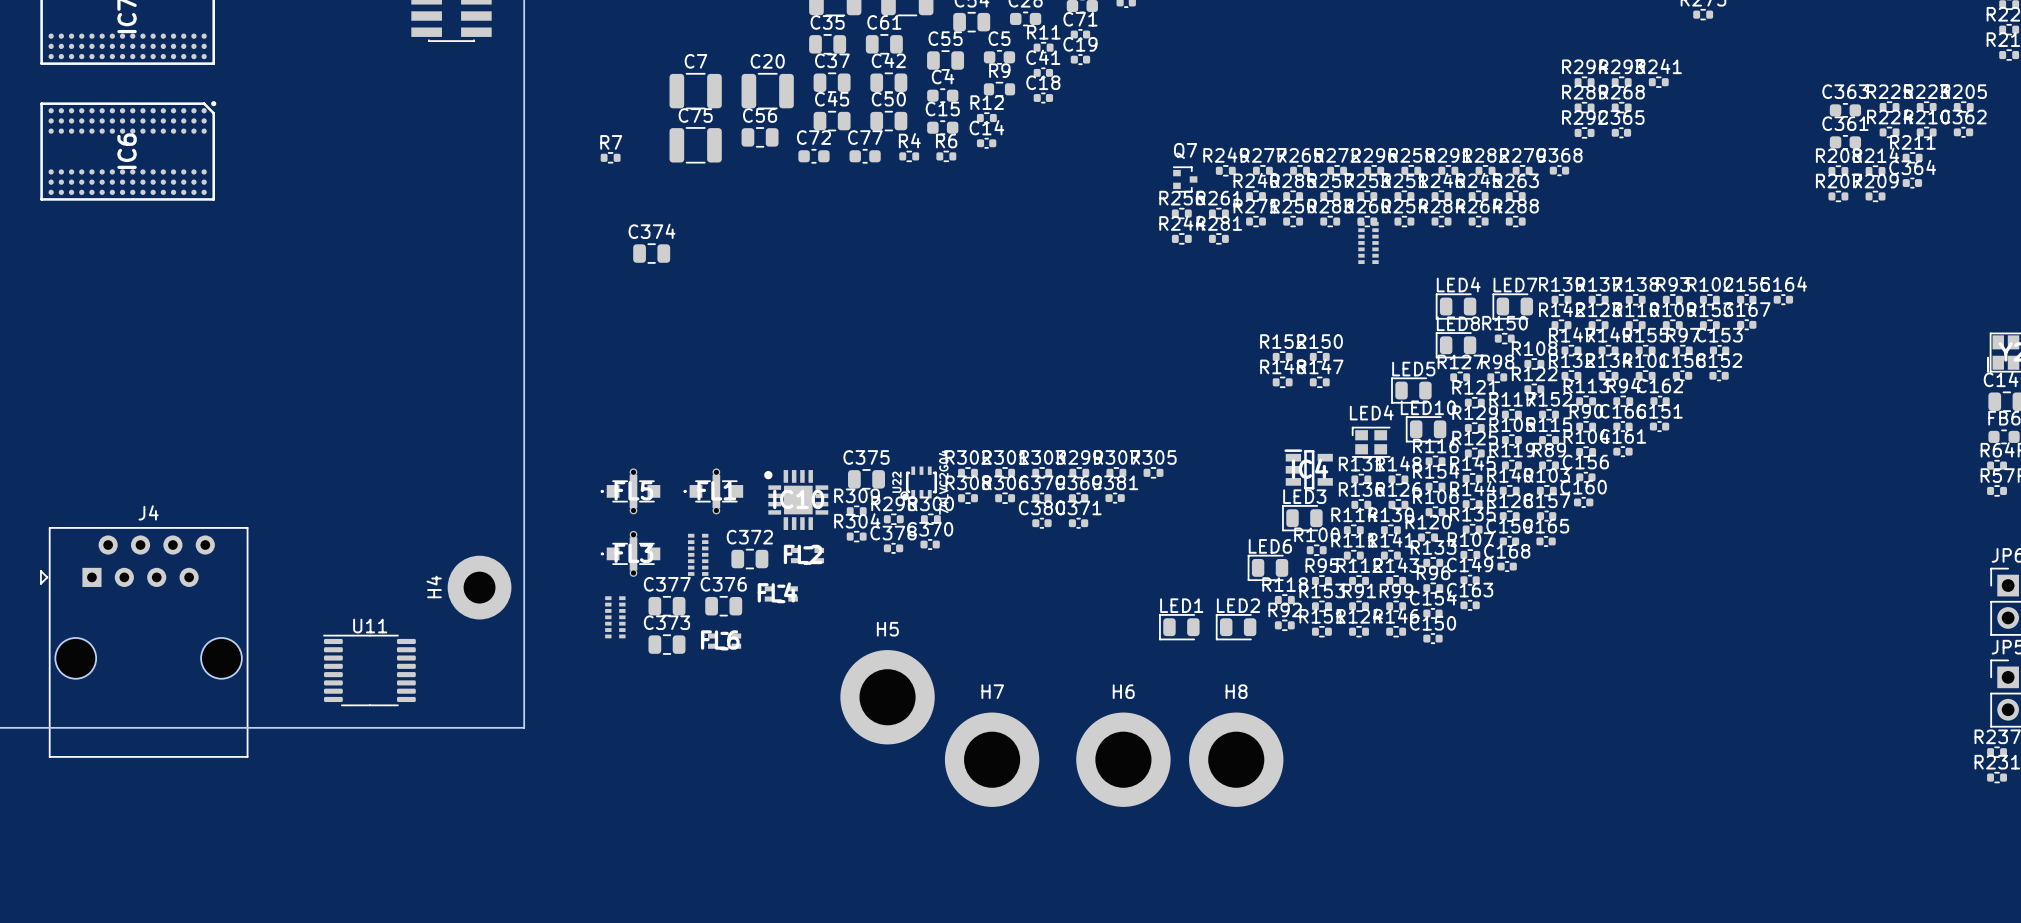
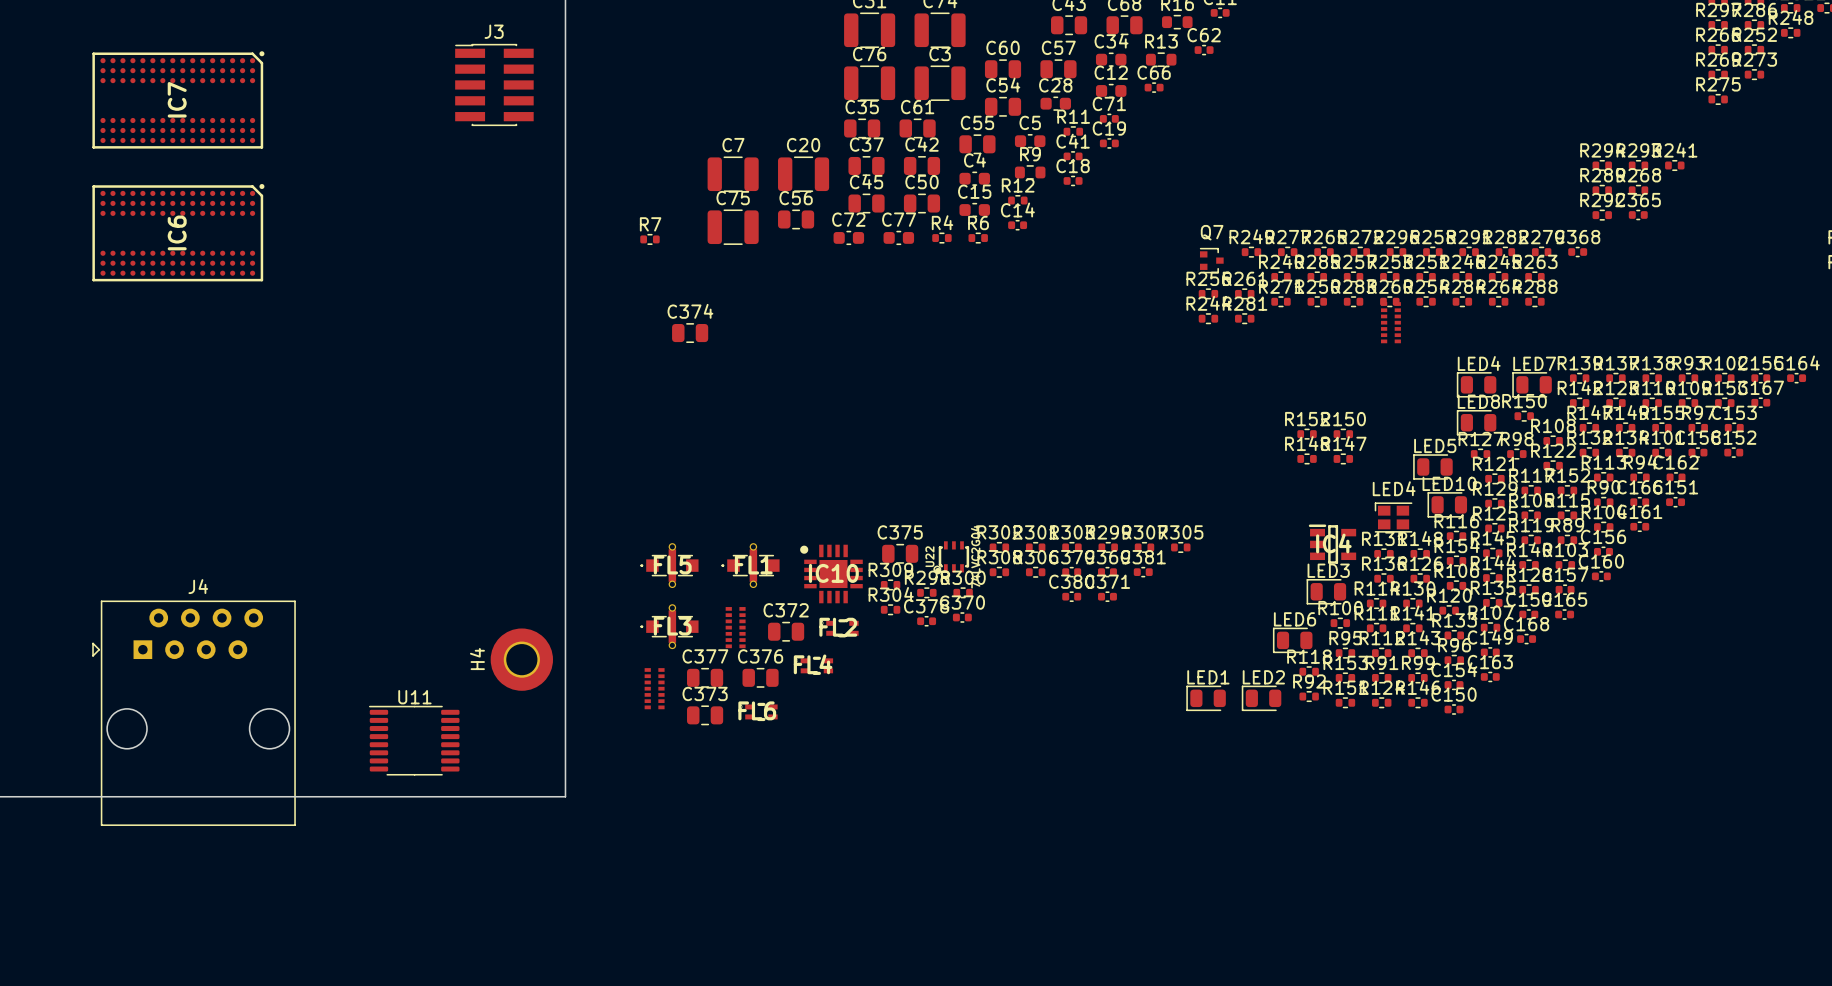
H5: (887, 697) -> none
H7: (992, 759) -> none
H6: (1123, 759) -> none
H8: (1236, 759) -> none

